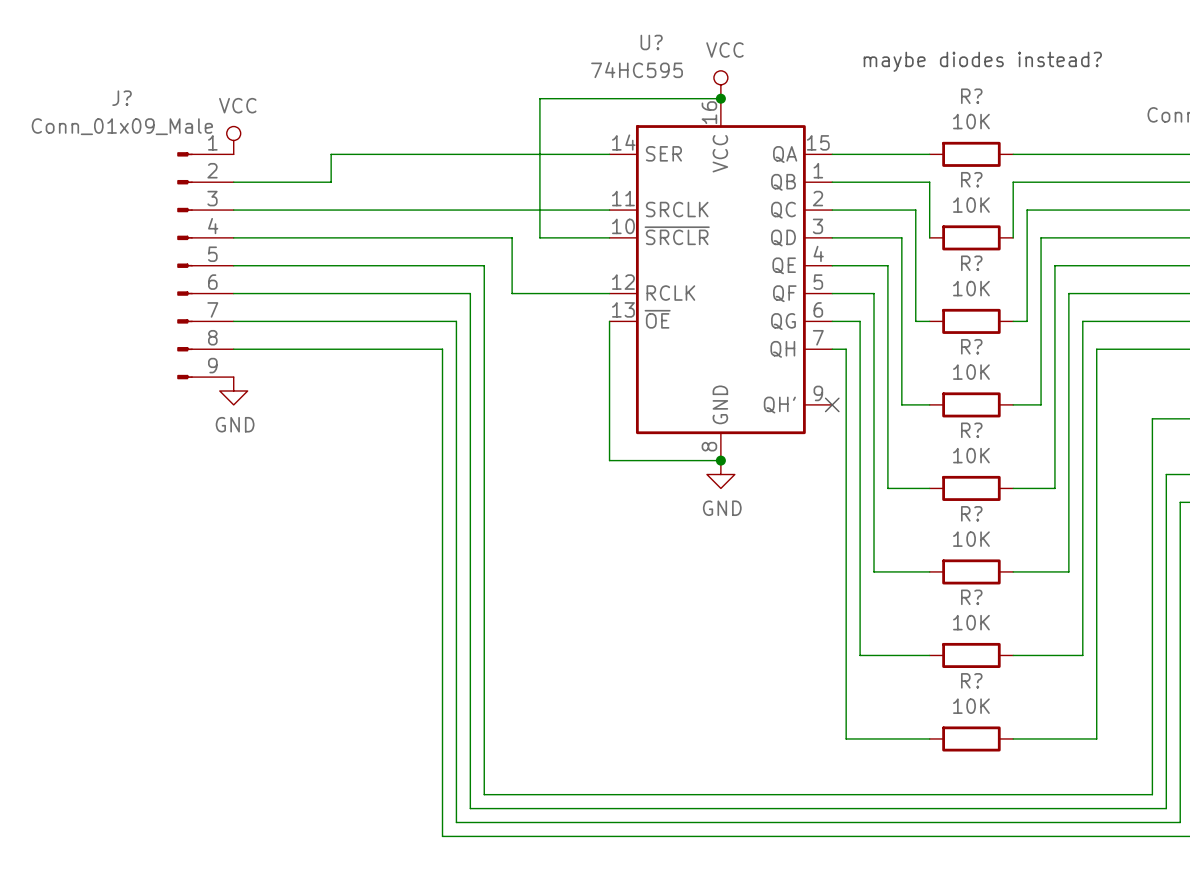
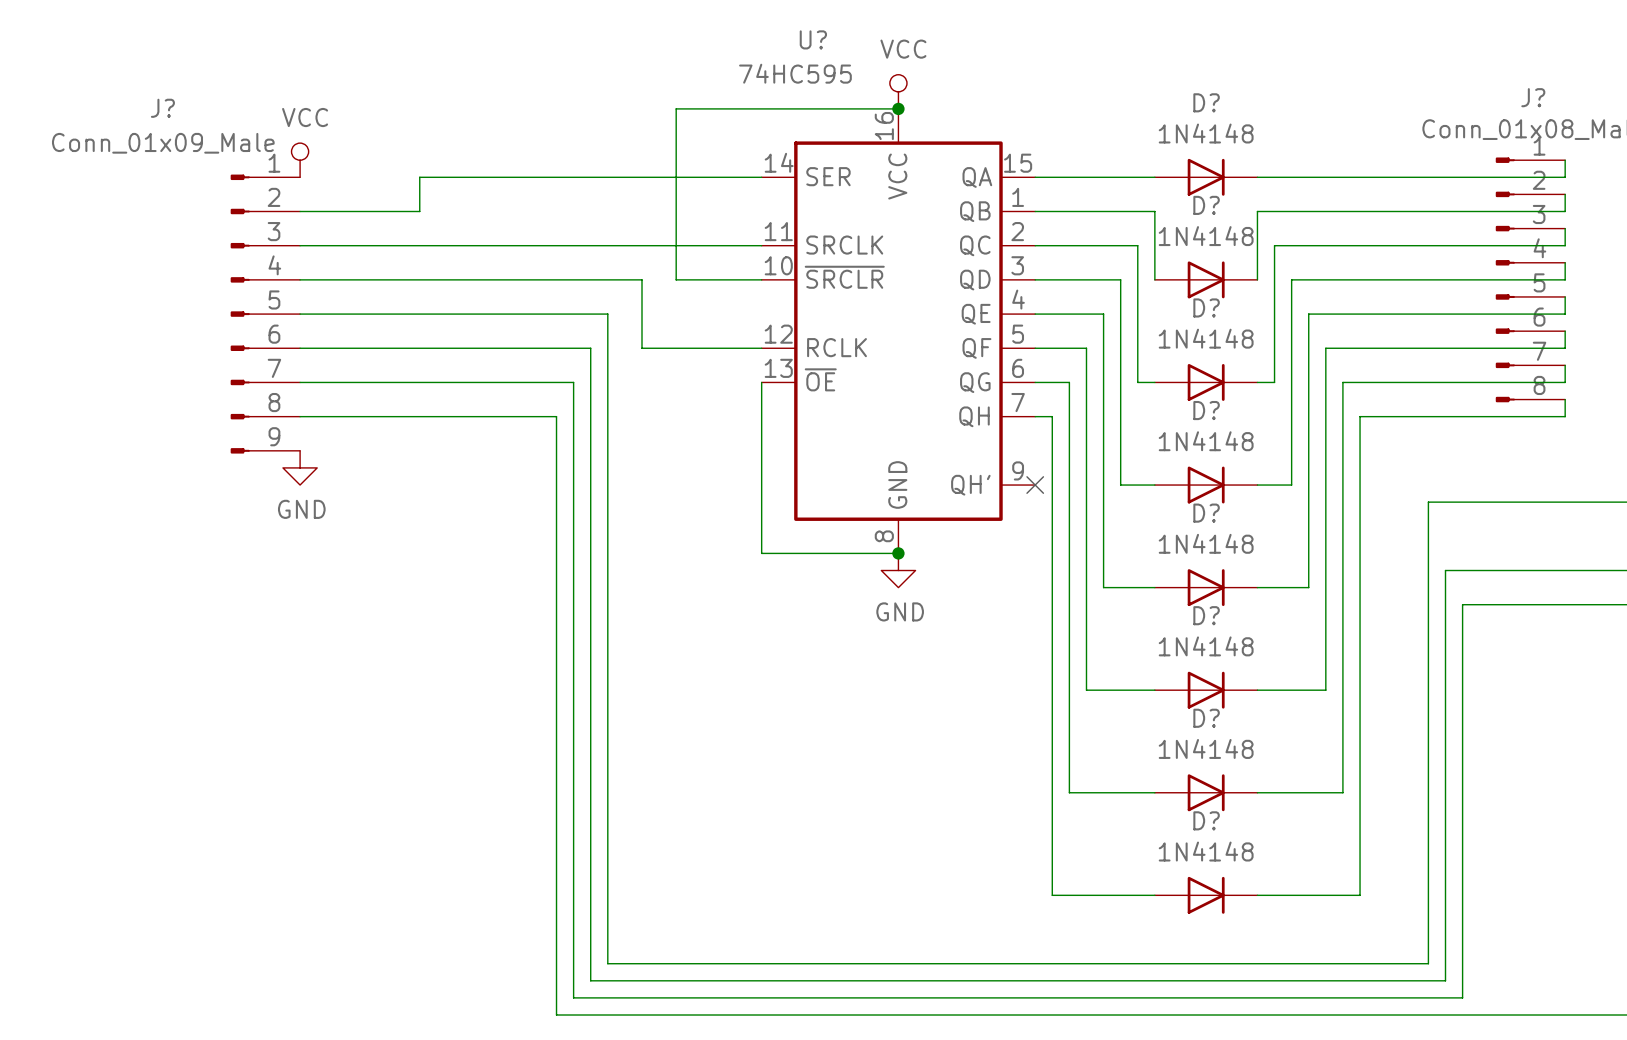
text: maybe diodes instead? (982, 61) -> none
R?: 10K (971, 154) -> none
D?: none -> 1N4148 (1206, 177)
R?: 10K (971, 237) -> none
D?: none -> 1N4148 (1206, 279)
R?: 10K (971, 321) -> none
D?: none -> 1N4148 (1206, 382)
R?: 10K (971, 404) -> none
D?: none -> 1N4148 (1206, 485)
R?: 10K (971, 488) -> none
D?: none -> 1N4148 (1206, 587)
R?: 10K (971, 571) -> none
D?: none -> 1N4148 (1206, 690)
R?: 10K (971, 655) -> none
D?: none -> 1N4148 (1206, 792)
R?: 10K (971, 738) -> none
D?: none -> 1N4148 (1206, 895)

